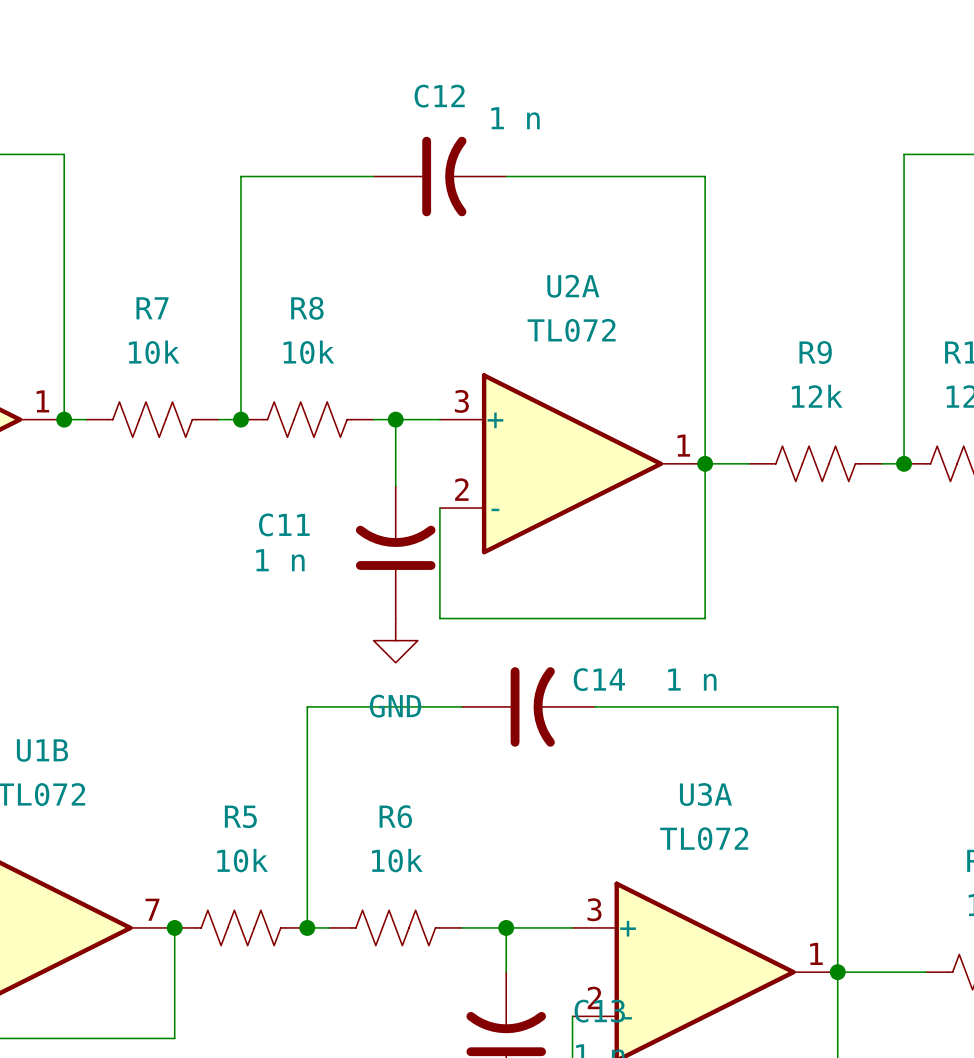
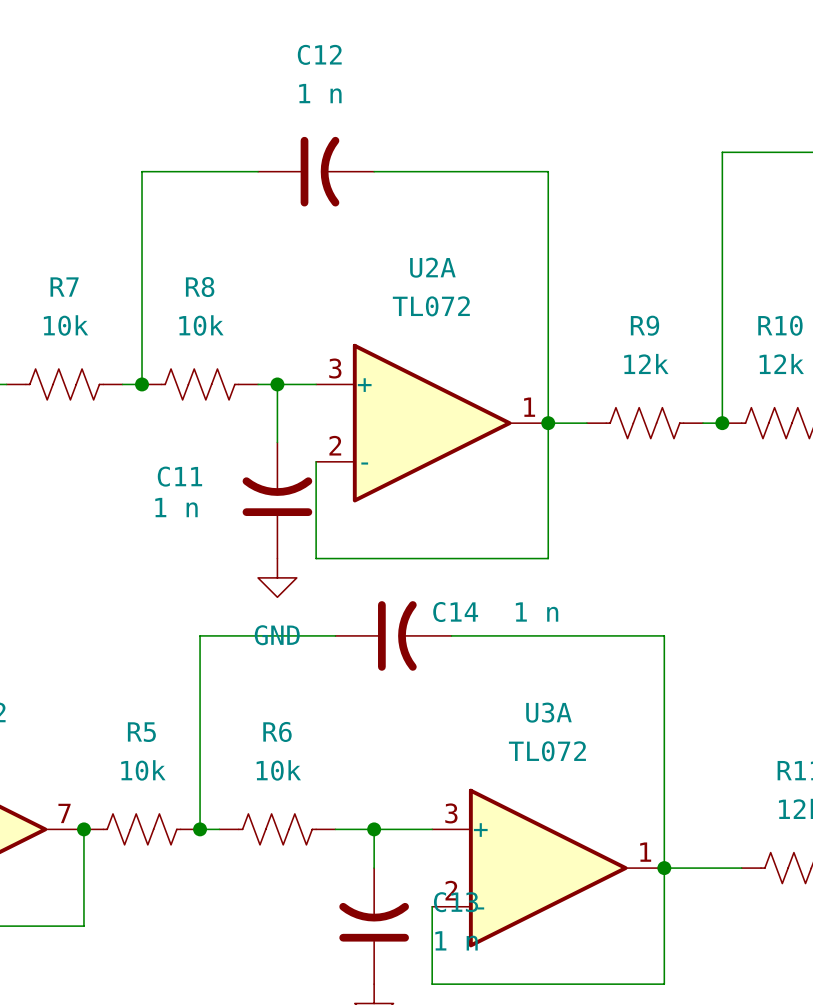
C12 name position: C12 (439, 96) -> C12 (319, 54)
C12 value position: 1 n (515, 118) -> 1 n (320, 93)

